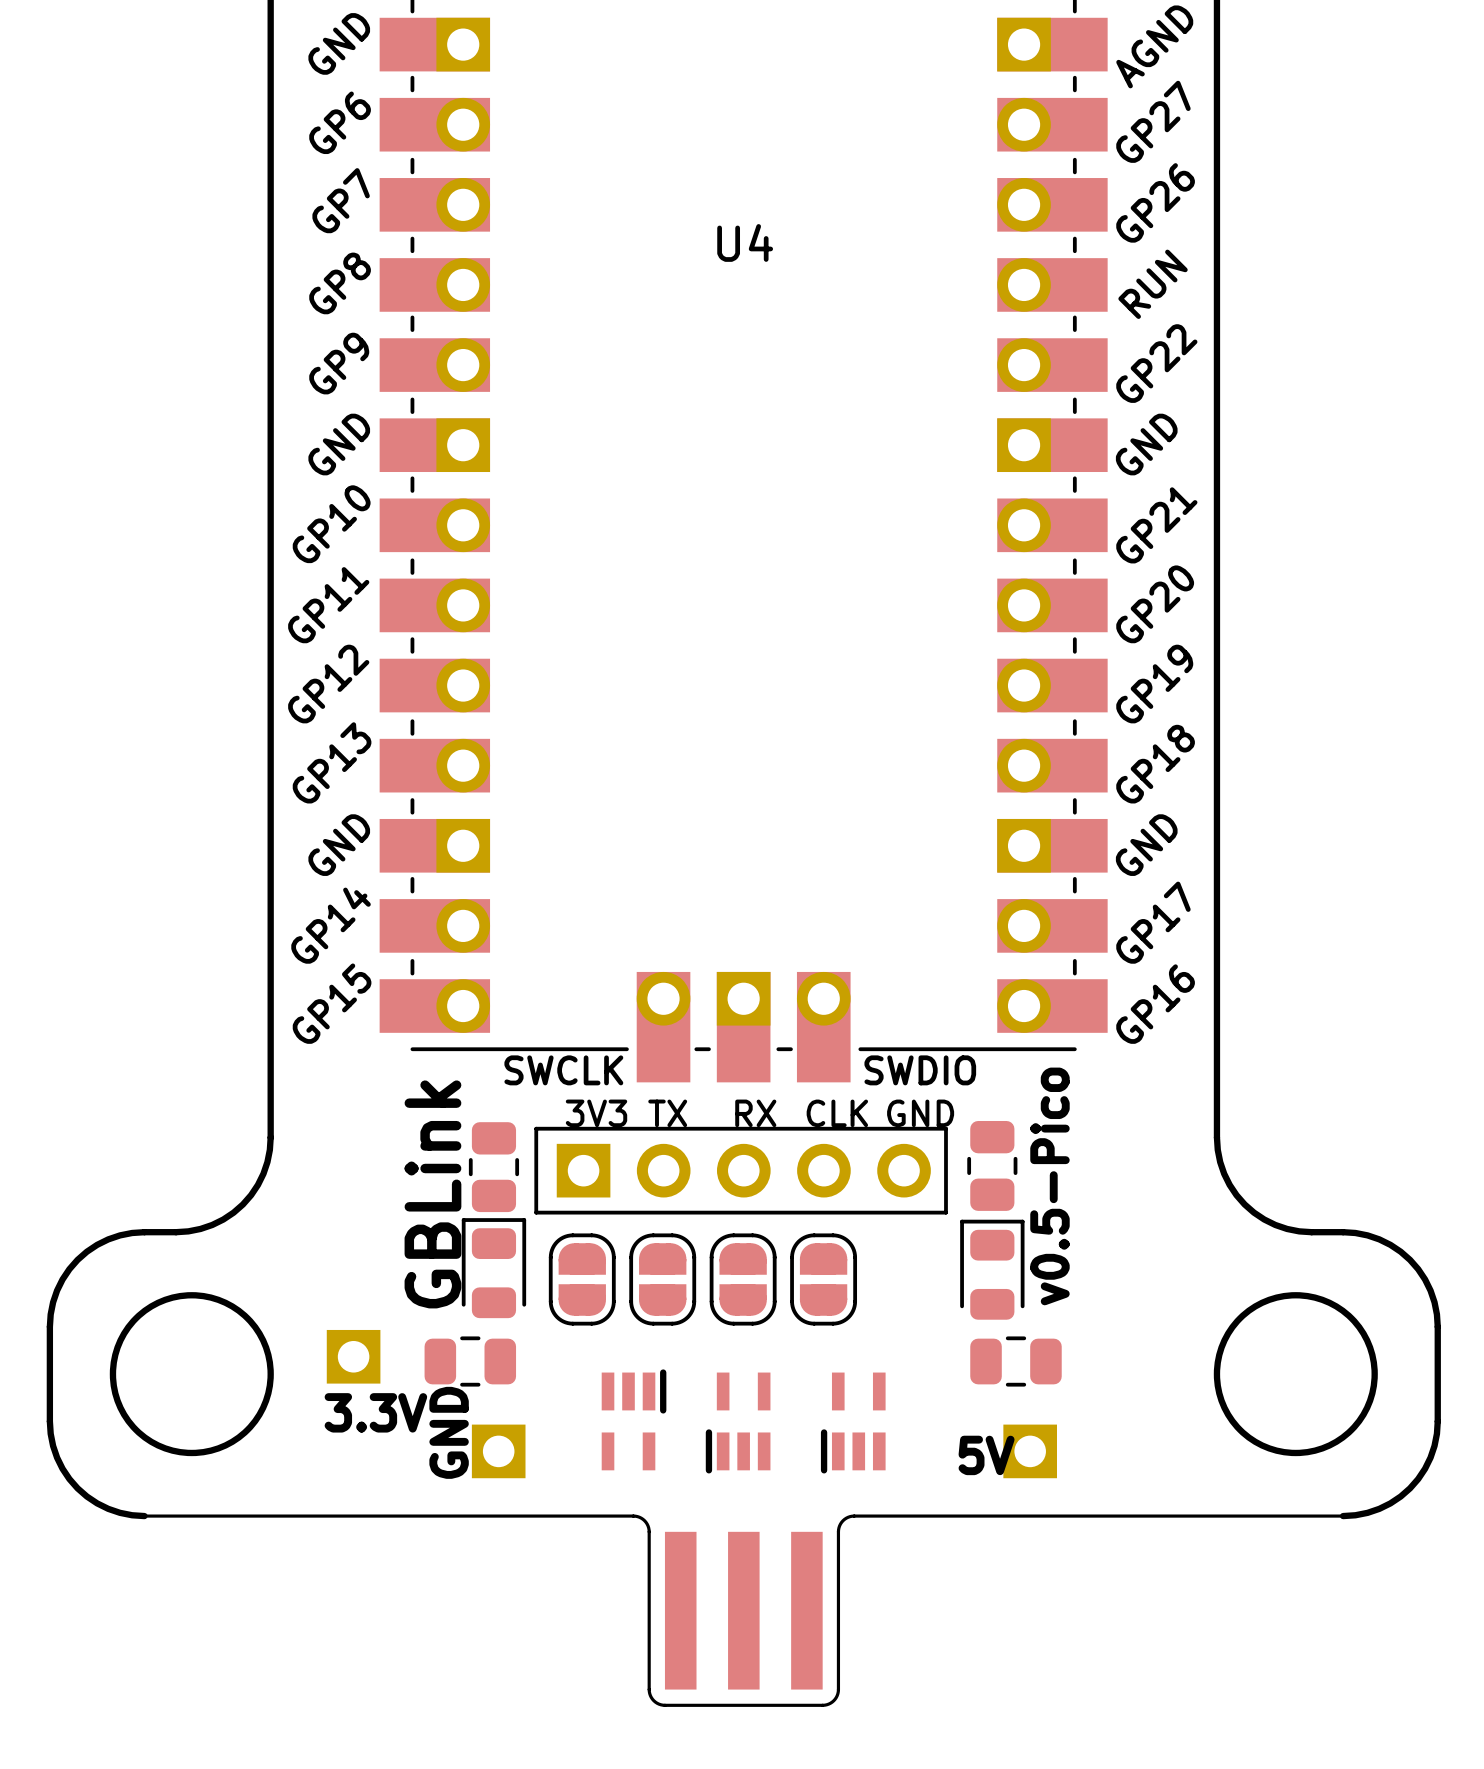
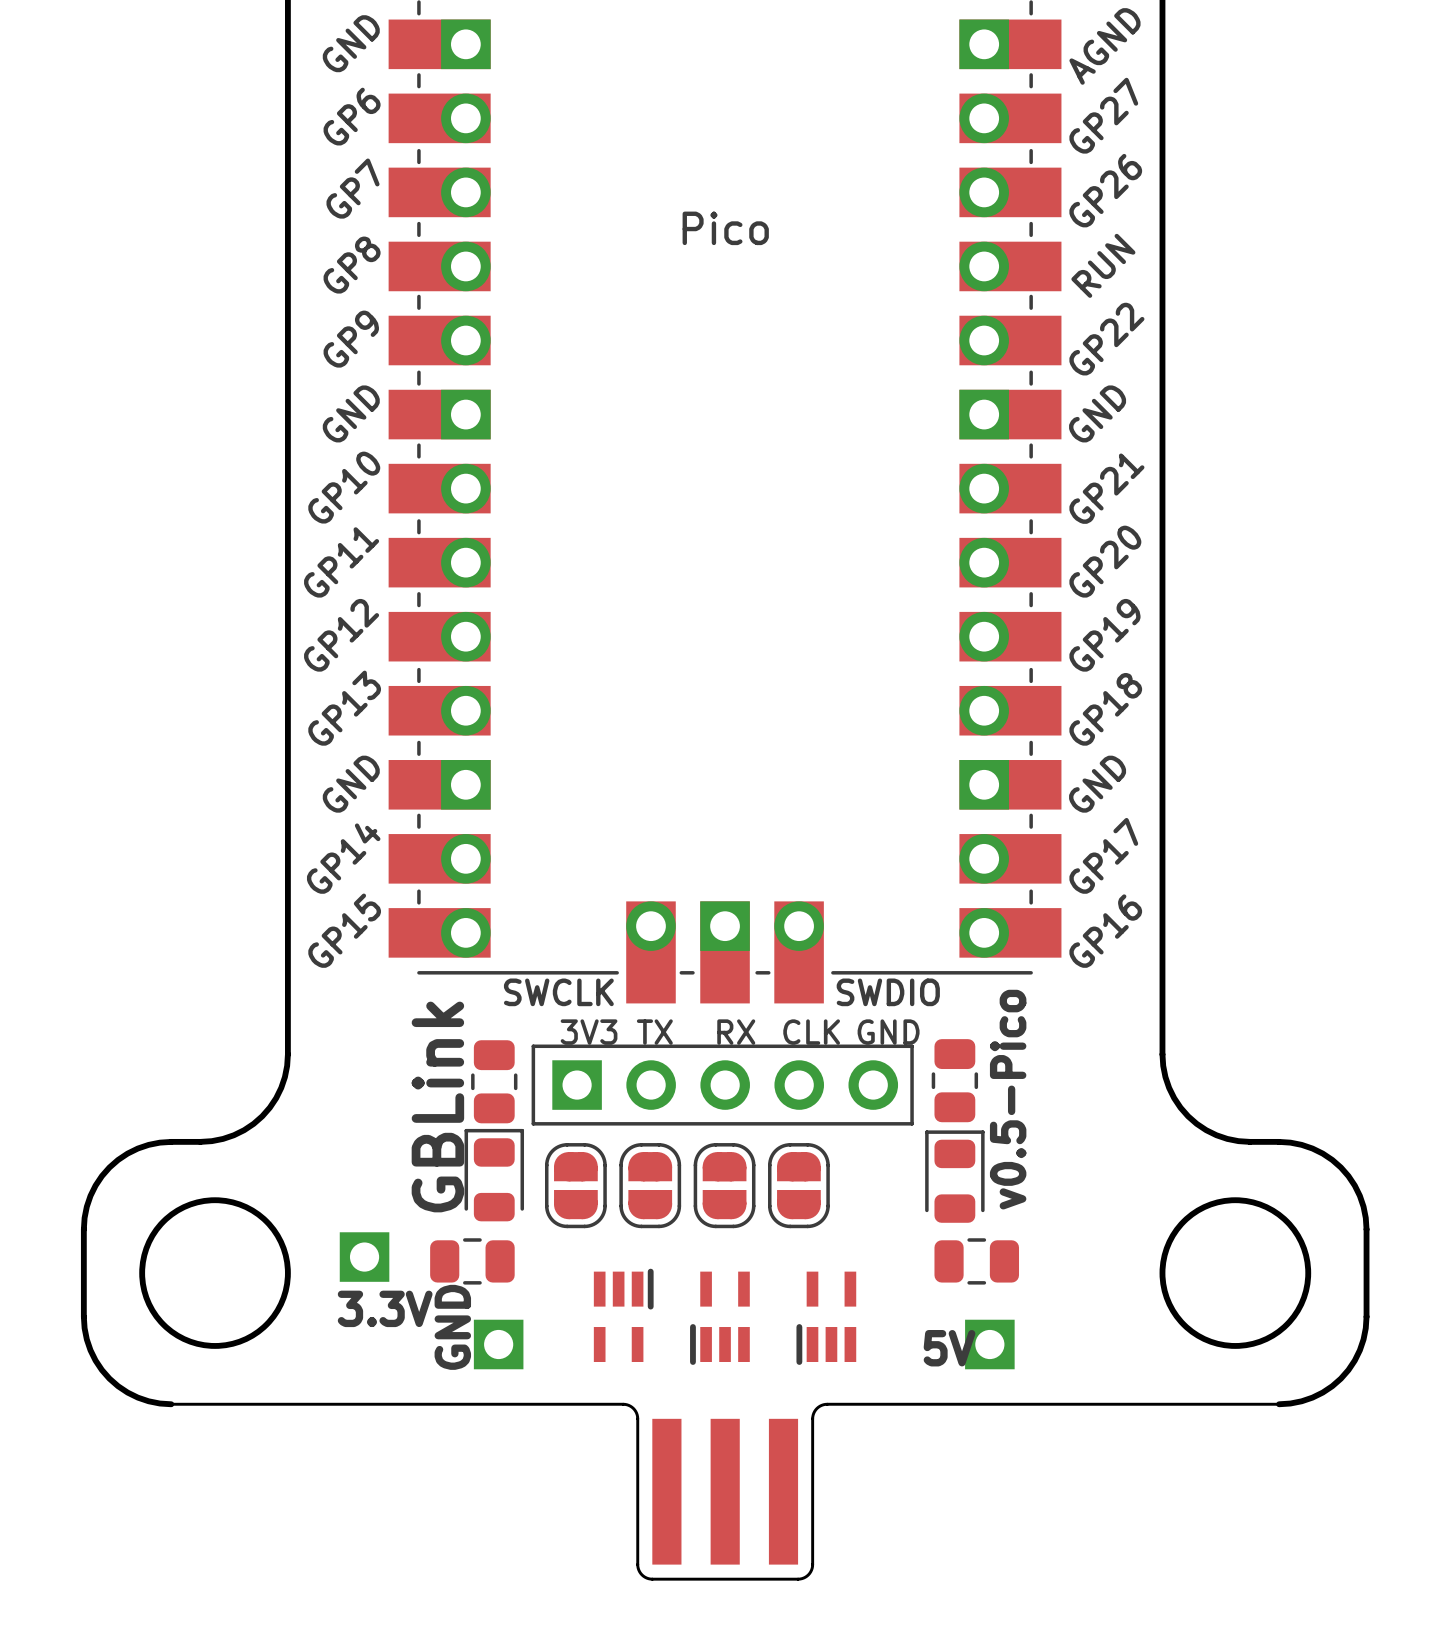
U4 name: U4 (745, 242) -> Pico (725, 228)

